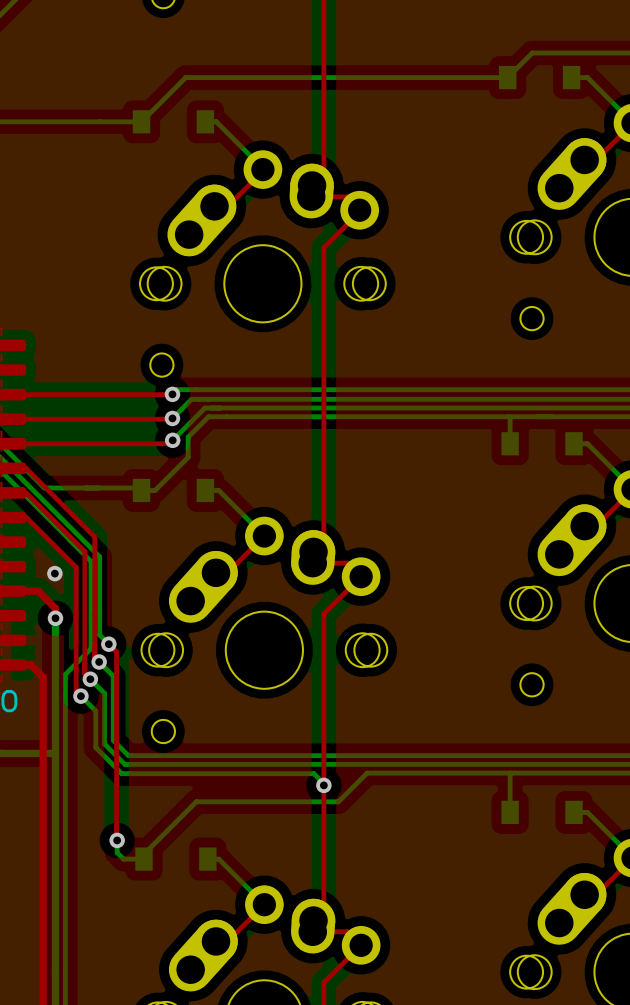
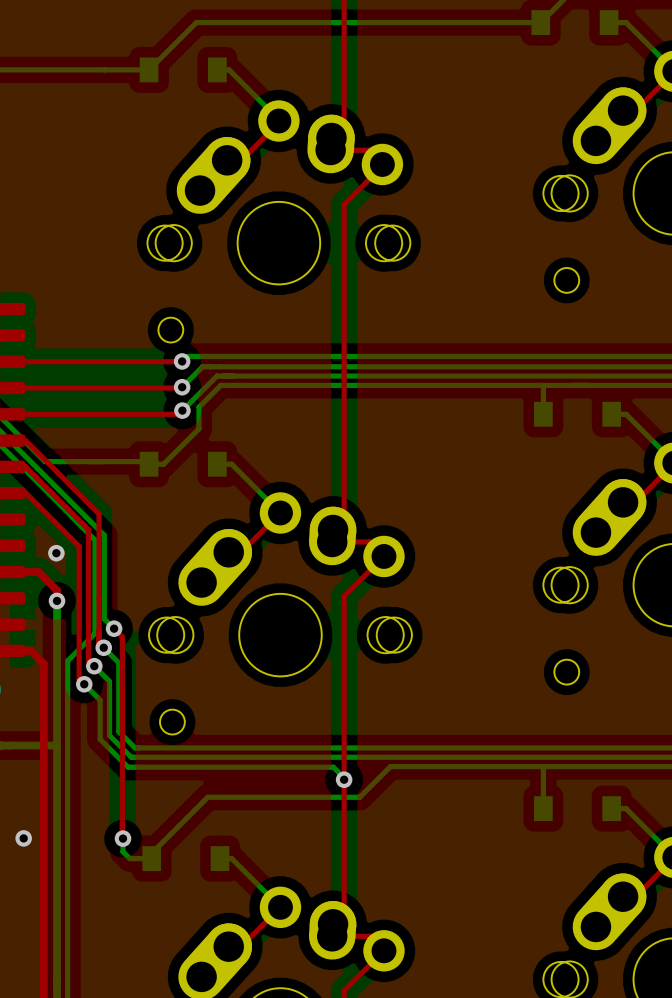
via: none -> (23, 838)

